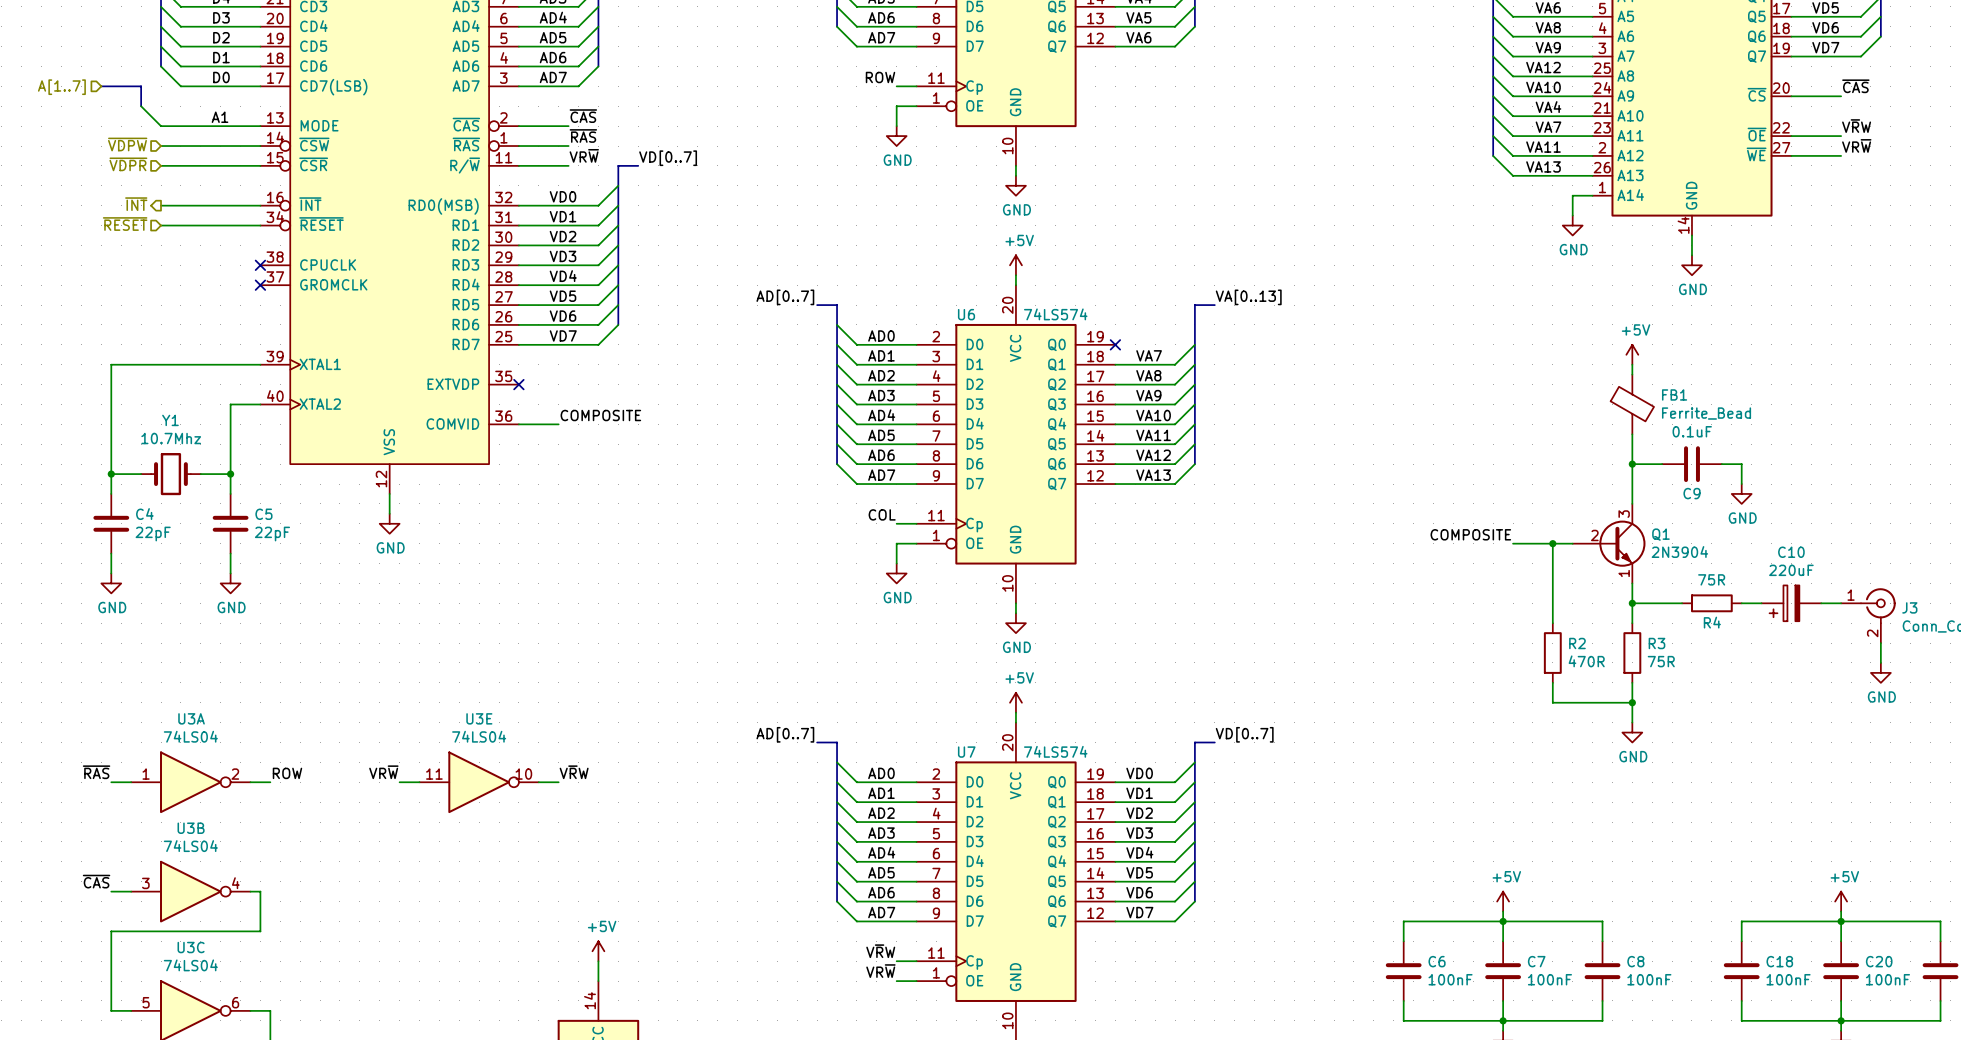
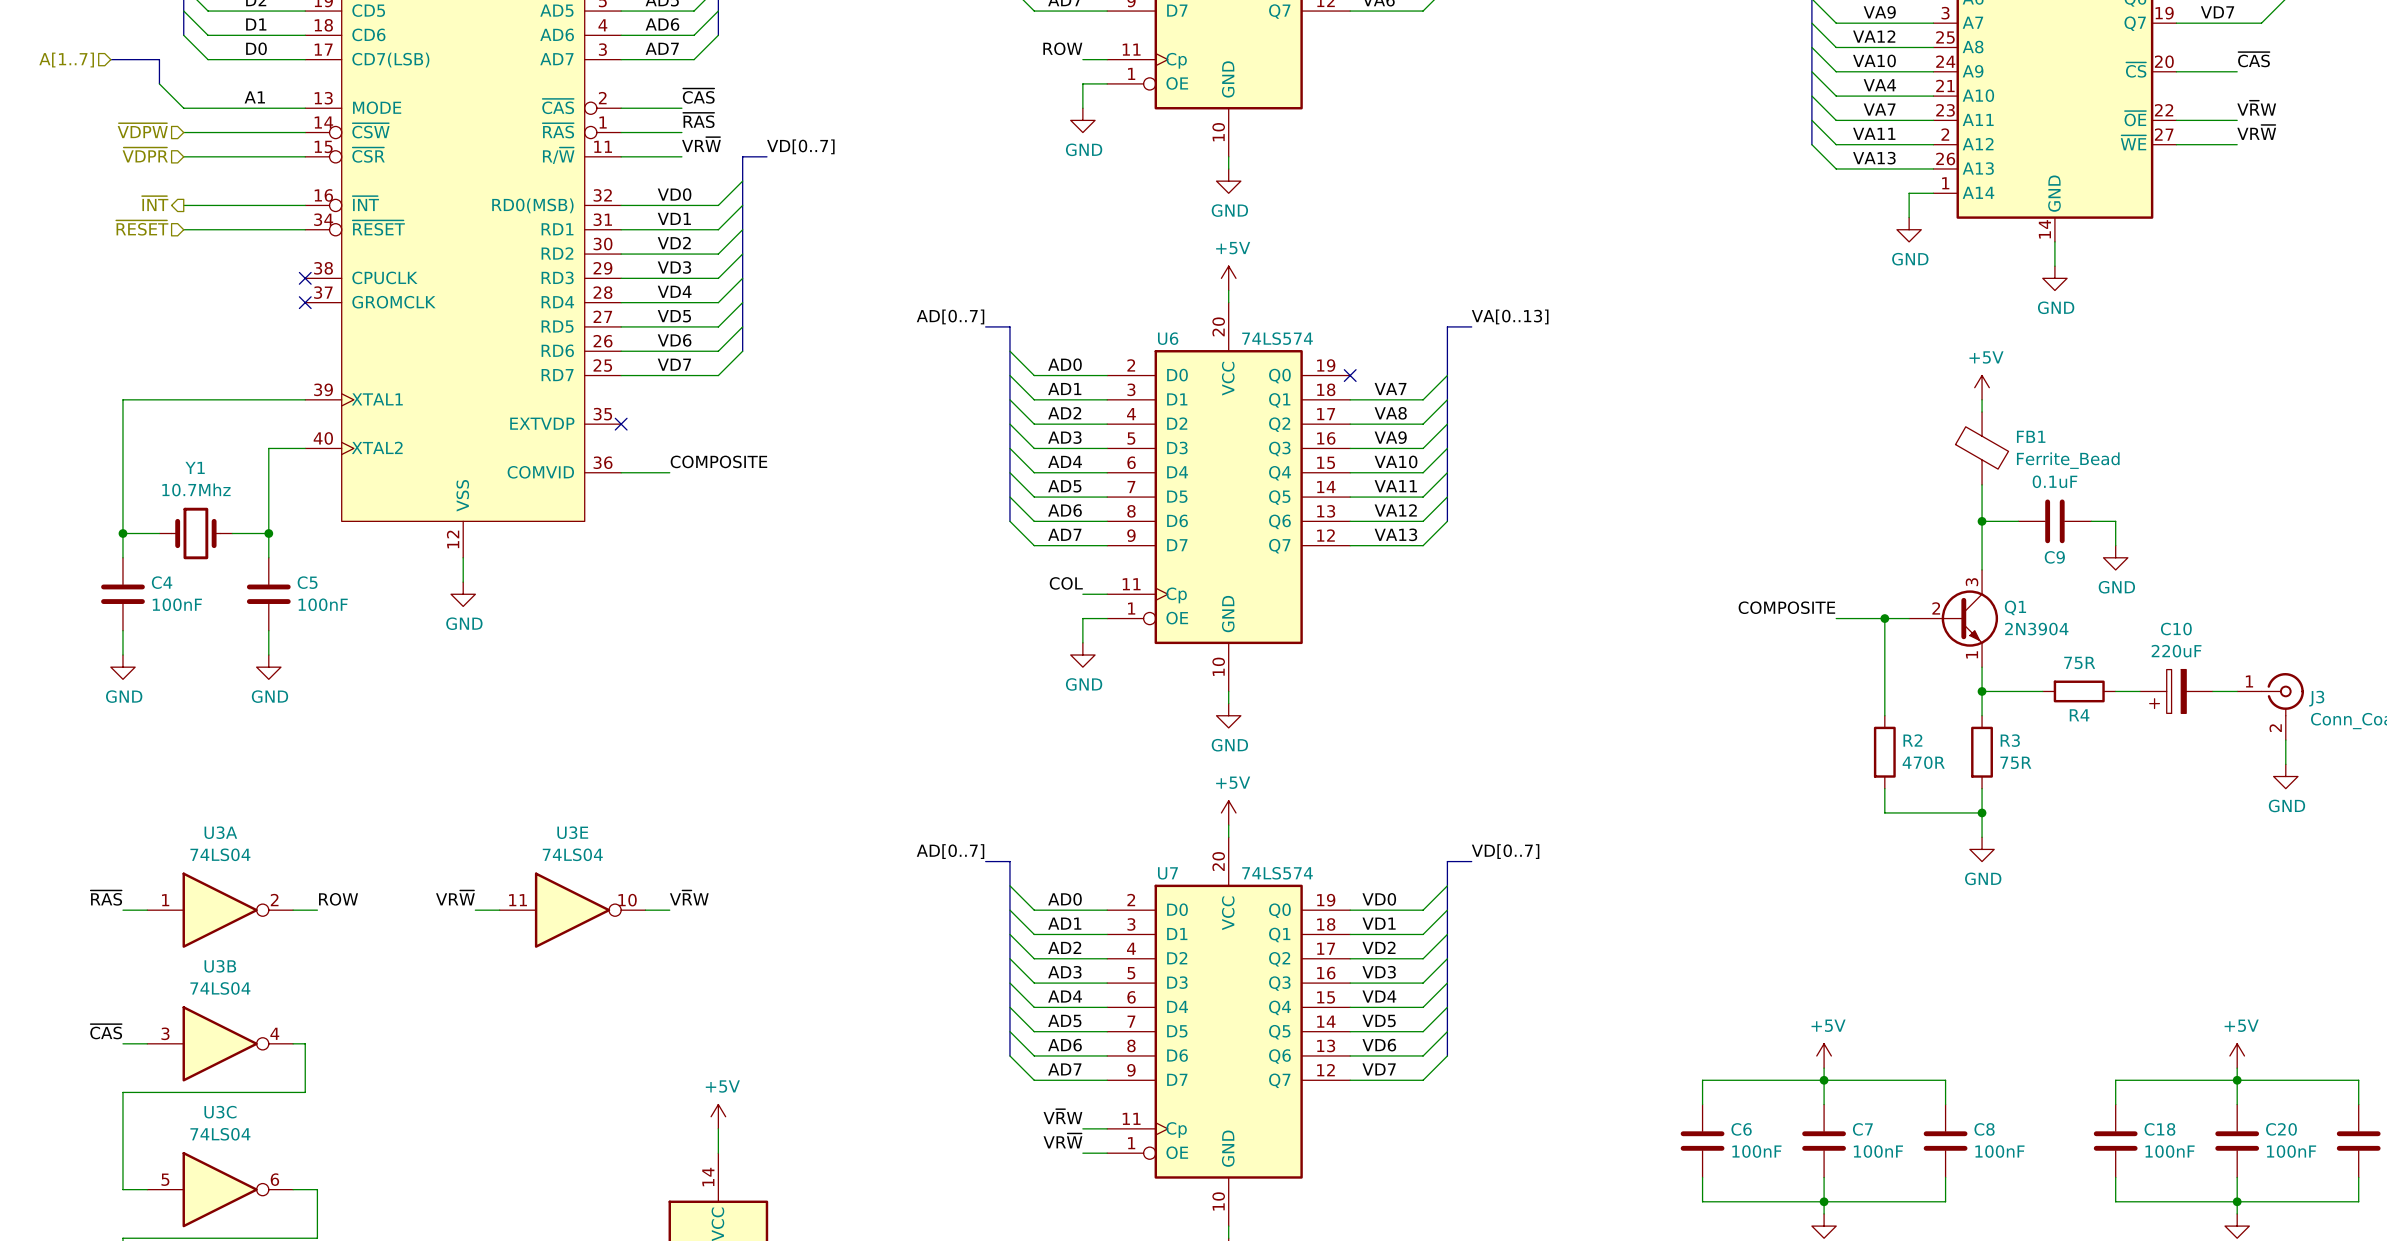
C4 value: 22pF (153, 534) -> 100nF (177, 604)
C5 value: 22pF (272, 534) -> 100nF (323, 604)

